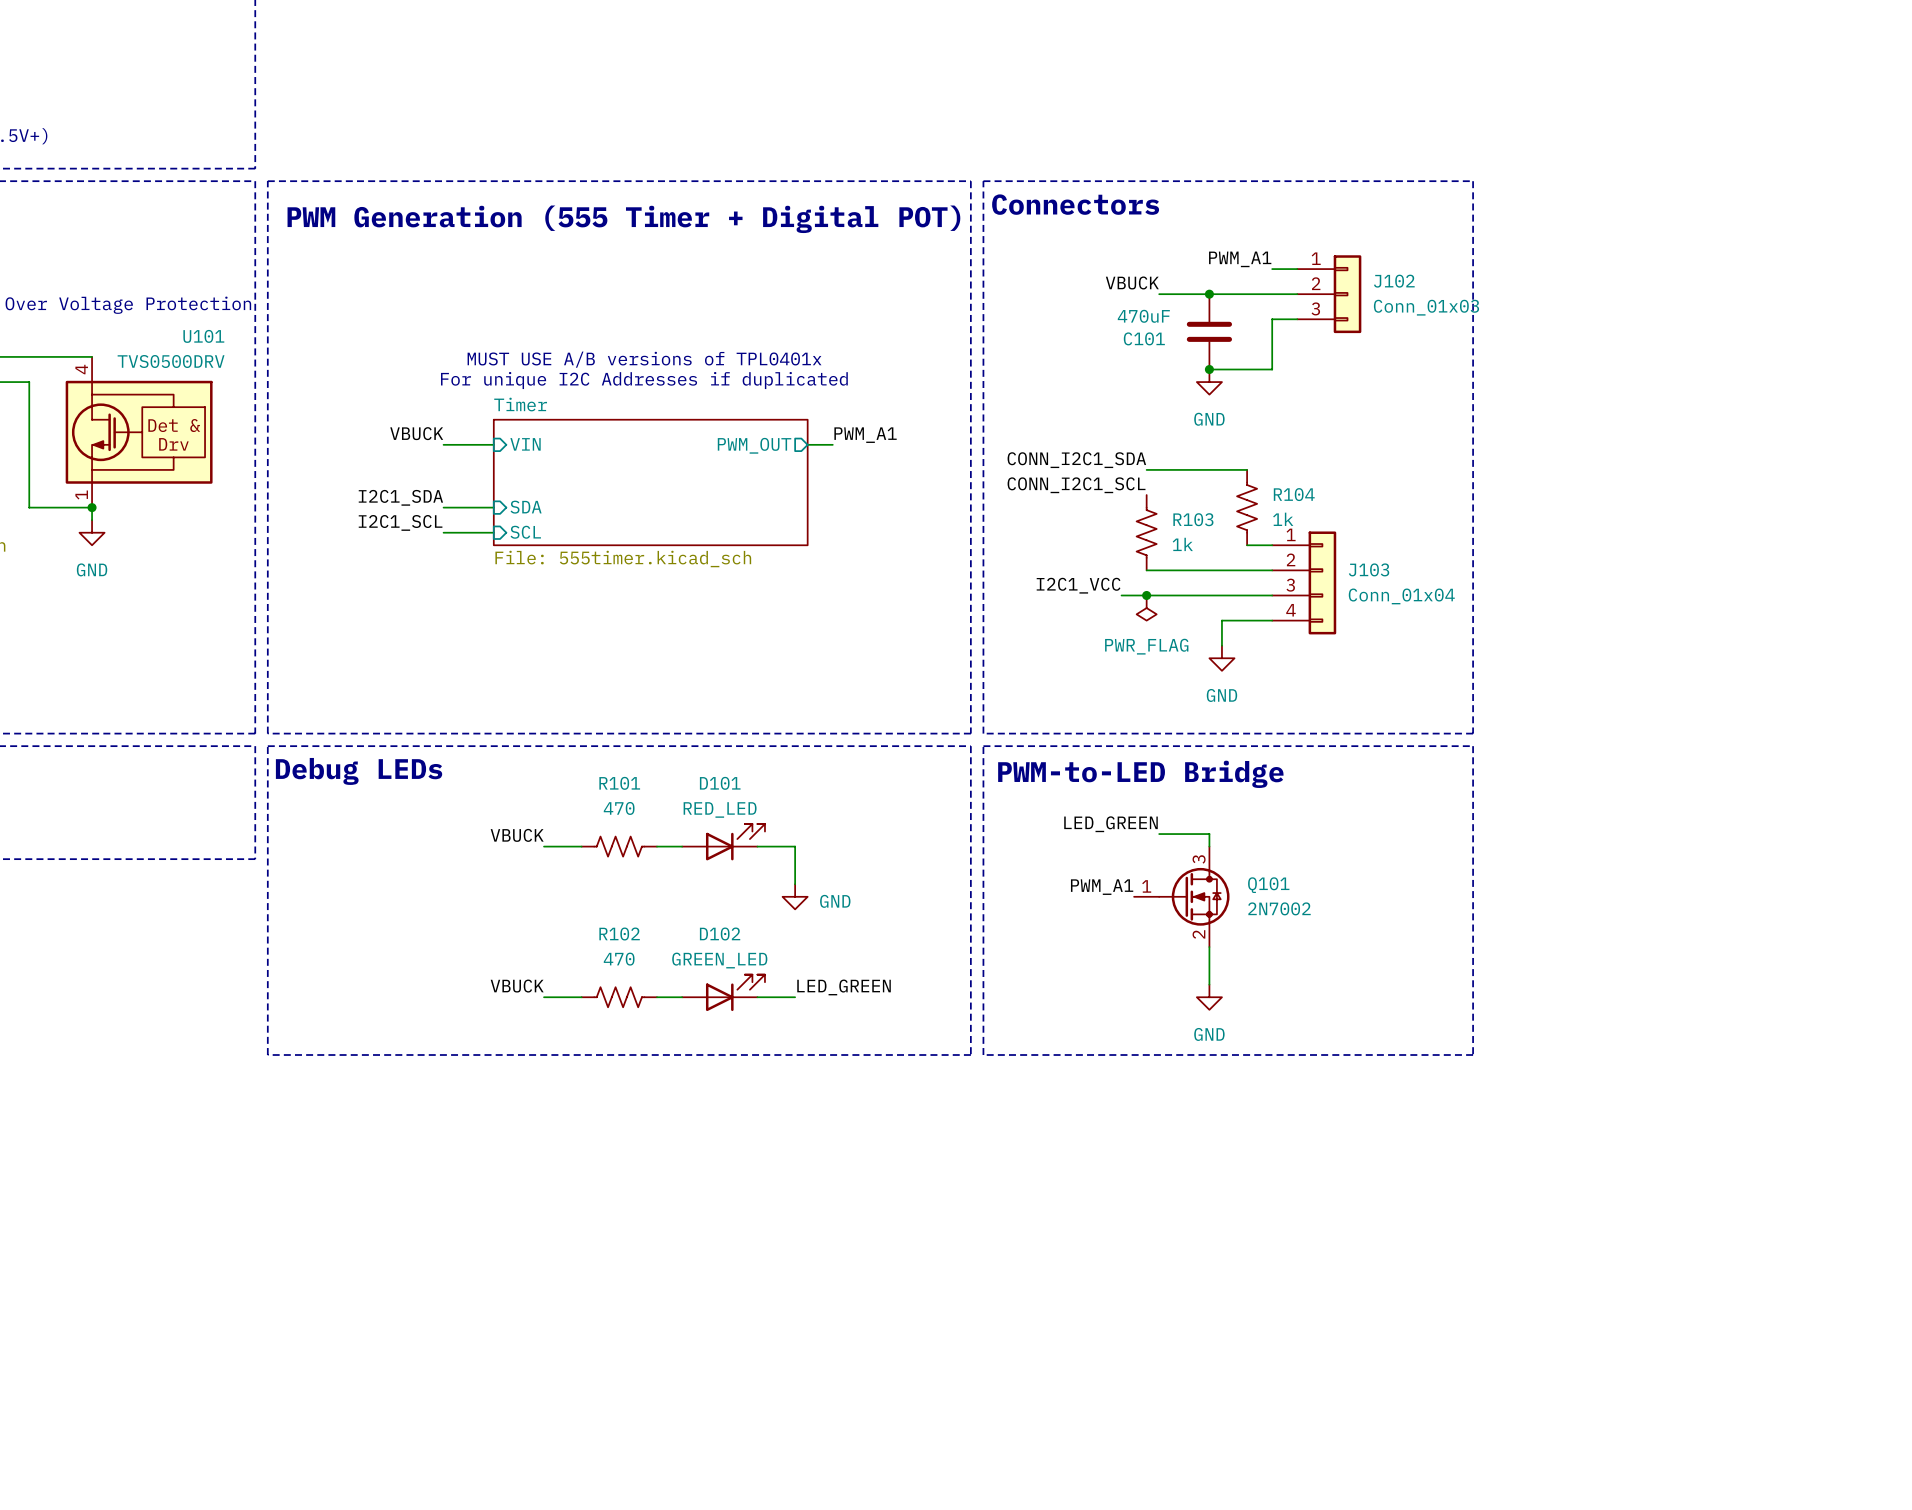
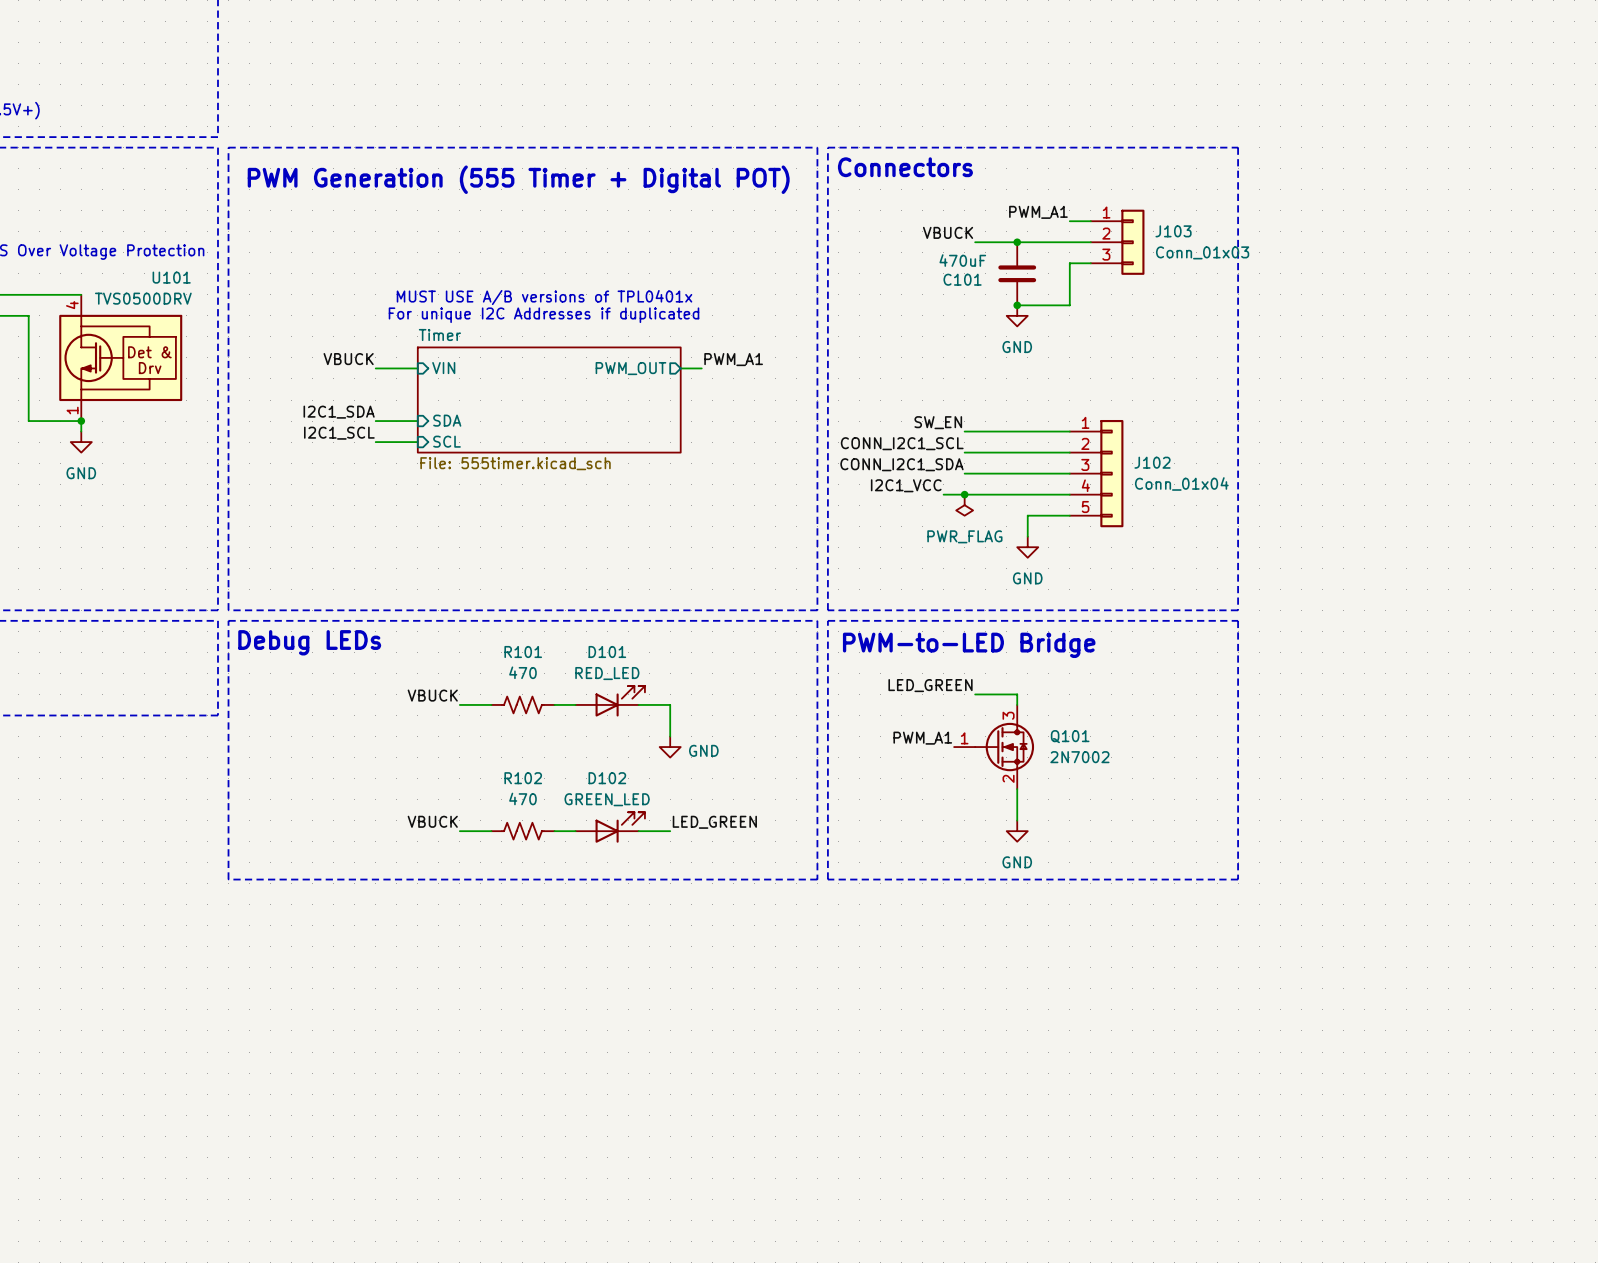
J102 name: J102 (1394, 281) -> J103 (1173, 231)
label position: CONN_I2C1_SDA (1076, 460) -> CONN_I2C1_SDA (901, 464)
wire: (1146, 469) (1247, 469) -> (964, 452) (1048, 452)
label position: CONN_I2C1_SCL (1076, 485) -> CONN_I2C1_SCL (902, 443)
R104: 1k (1247, 507) -> none
label: none -> SW_EN (938, 422)
wire: none -> (964, 431) (1069, 431)
R103: 1k (1146, 532) -> none
J102: none -> Conn_01x04 (1096, 473)
J103: Conn_01x04 (1304, 582) -> none

